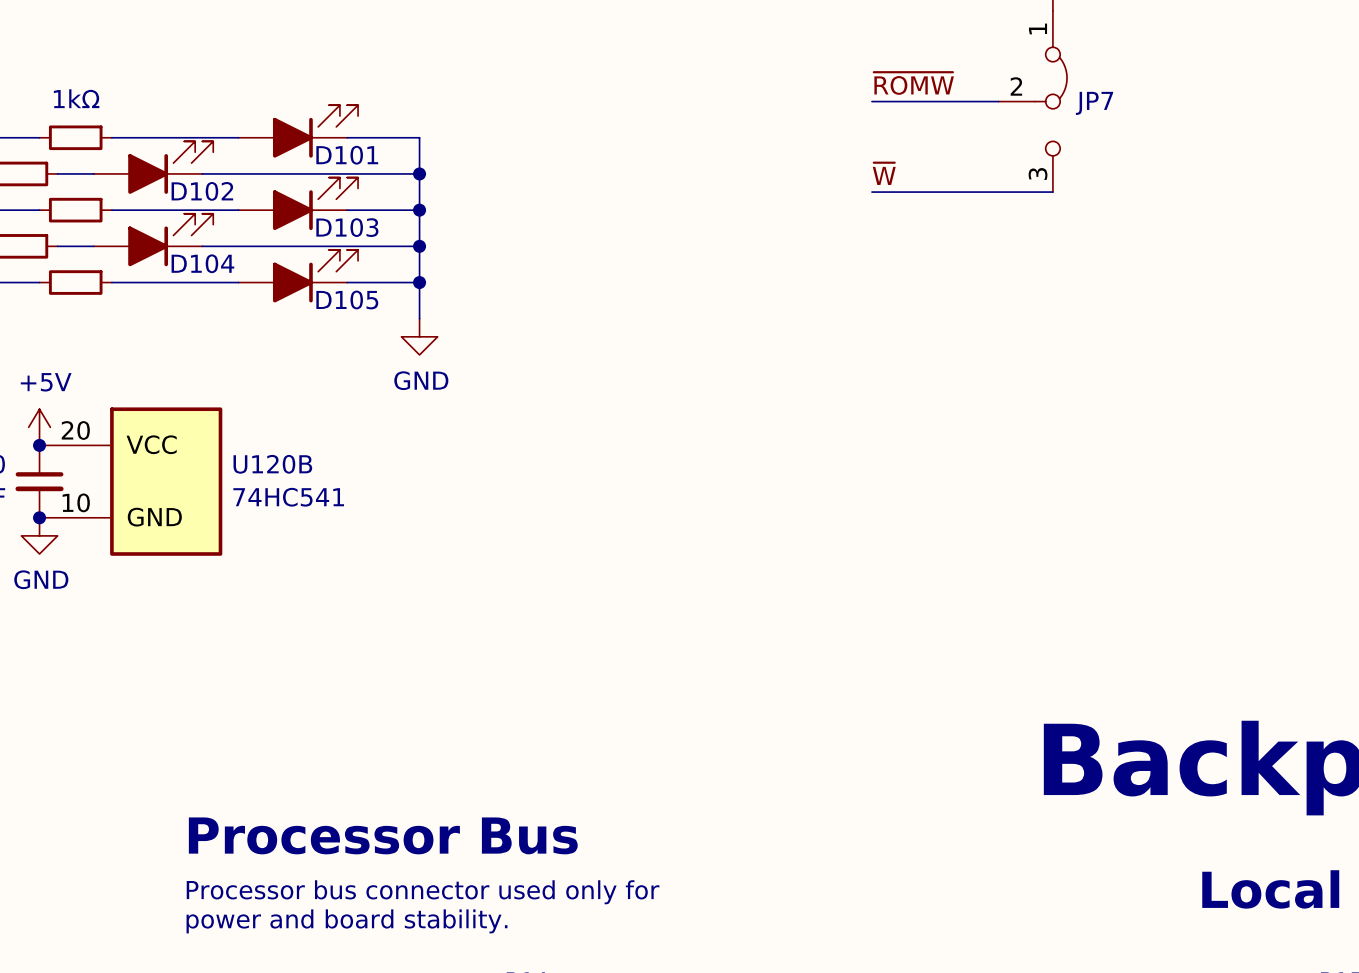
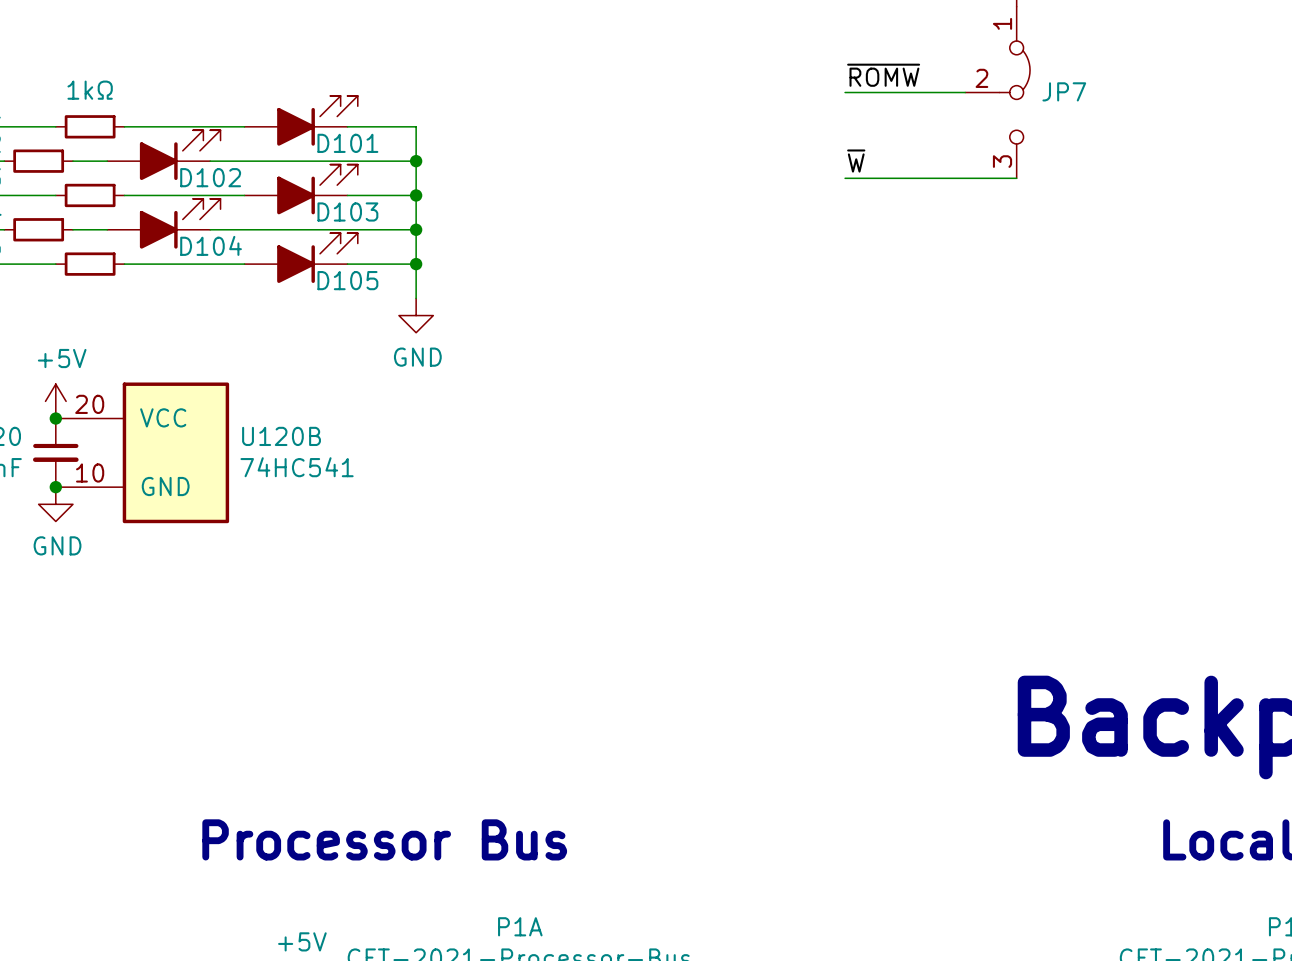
text position: Processor Bus (383, 835) -> Processor Bus (384, 839)
text: Processor bus connector used only for (423, 892) -> none
text: power and board stability. (347, 921) -> none

